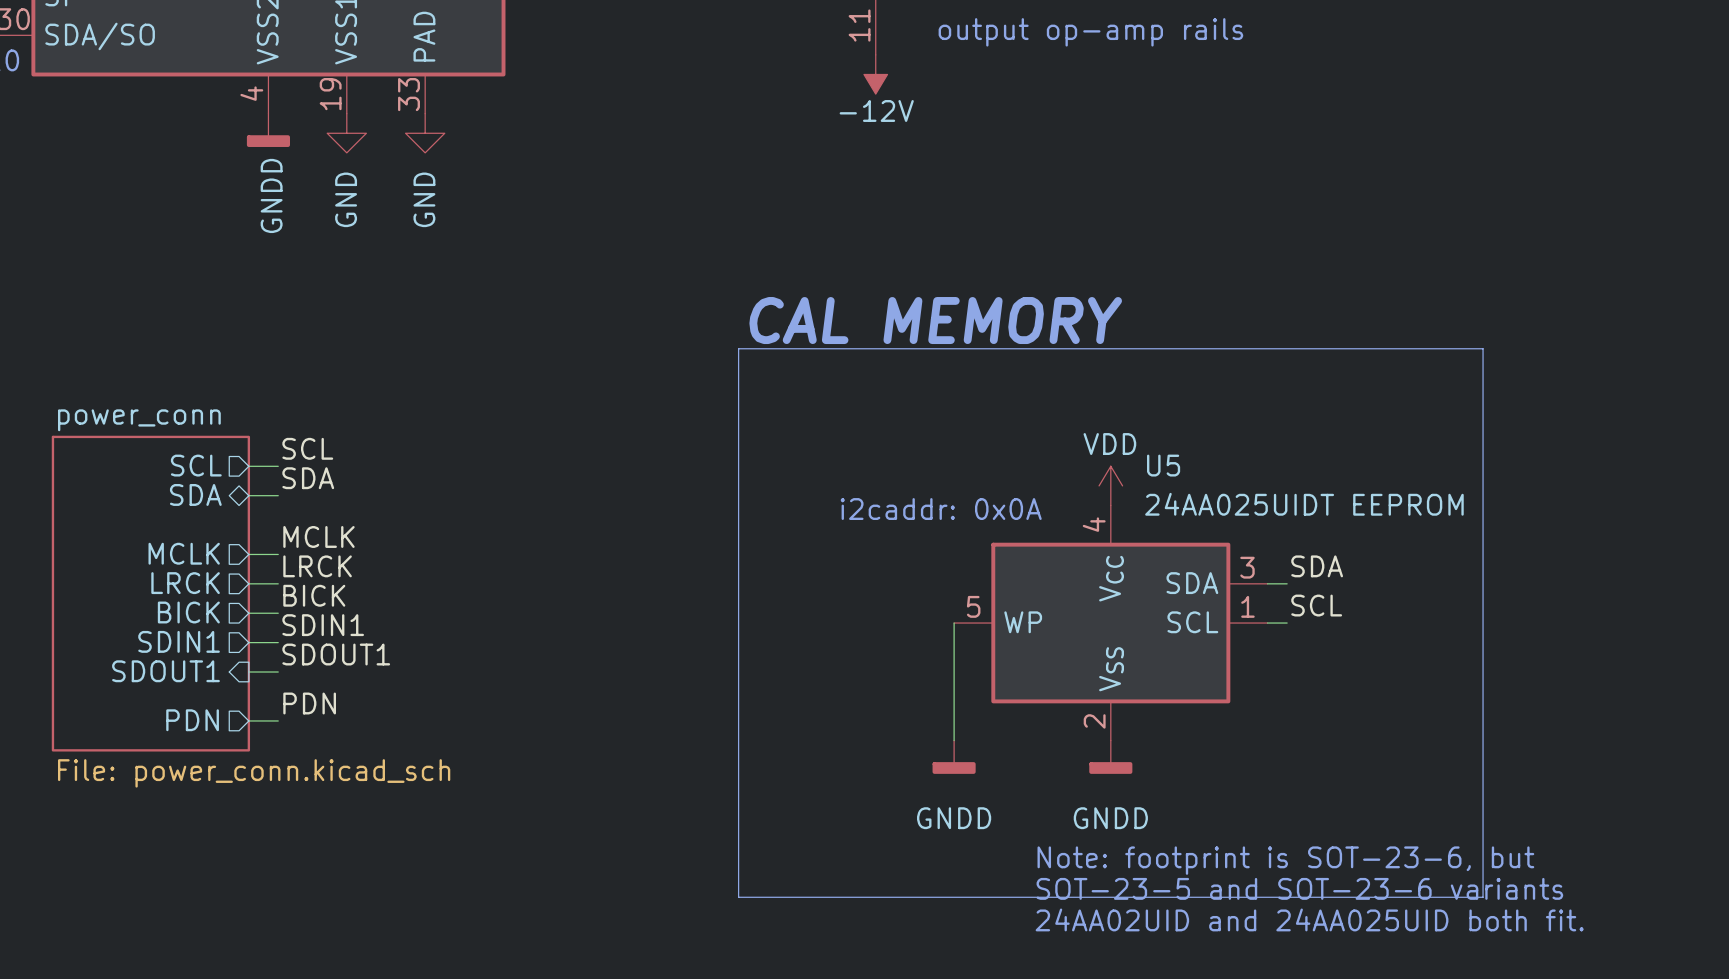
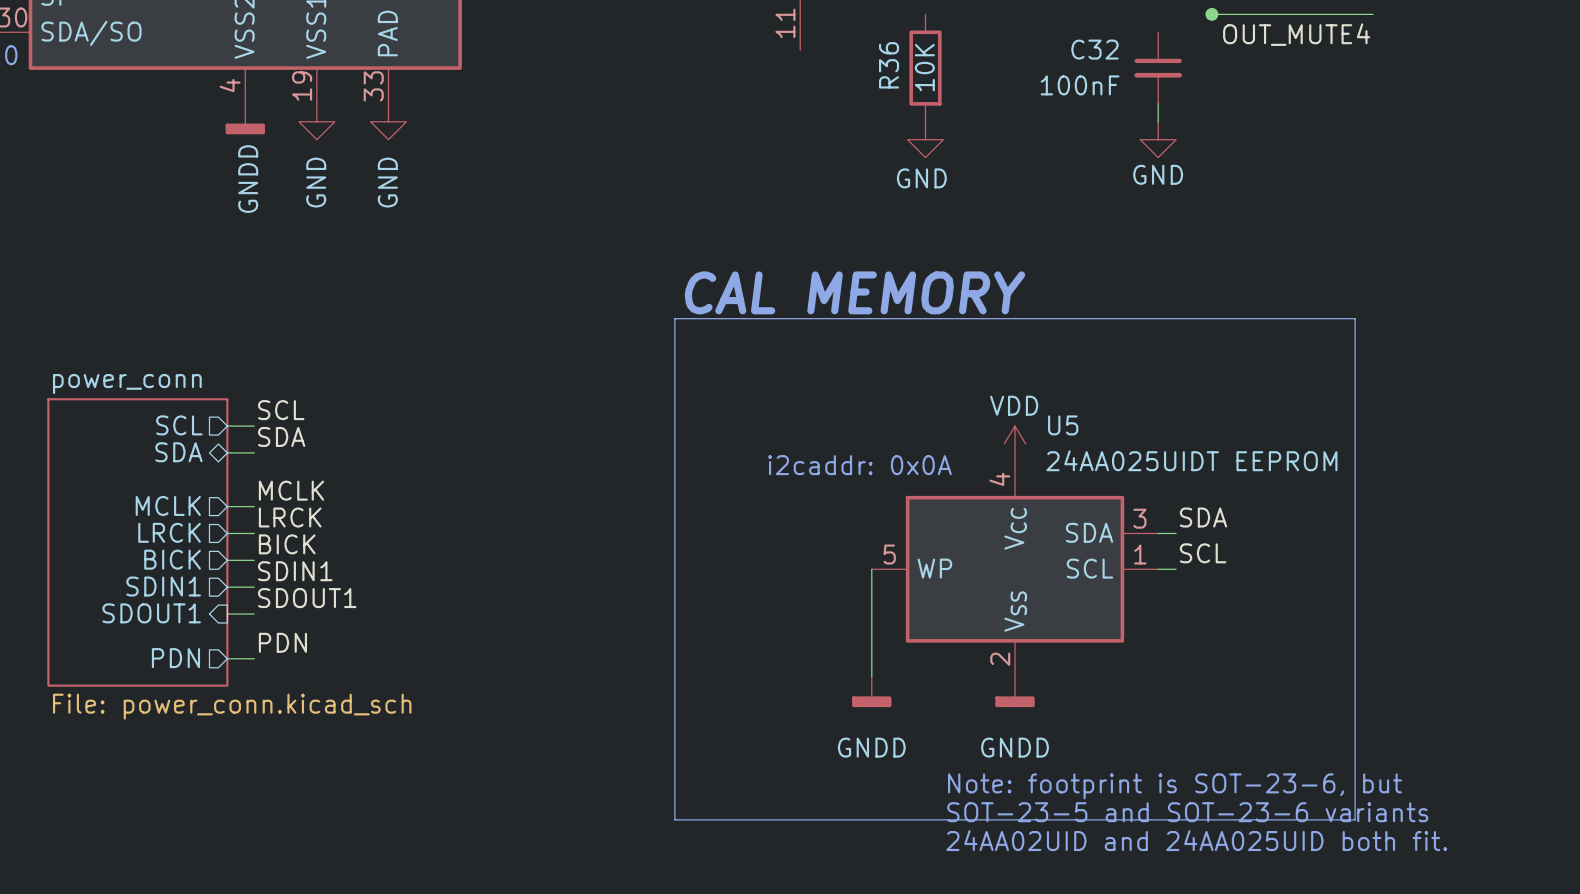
wire: none -> (1211, 14) (1373, 14)
junction: none -> (1211, 14)
text: output op-amp rails (1090, 32) -> none
label: none -> OUT_MUTE4 (1296, 34)
power symbol: -12V (875, 74) -> none
R36: none -> 10K (925, 68)
C32: none -> 100nF (1158, 68)
wire: none -> (1158, 103) (1158, 121)
power symbol: none -> GND (925, 139)
power symbol: none -> GND (1158, 139)

